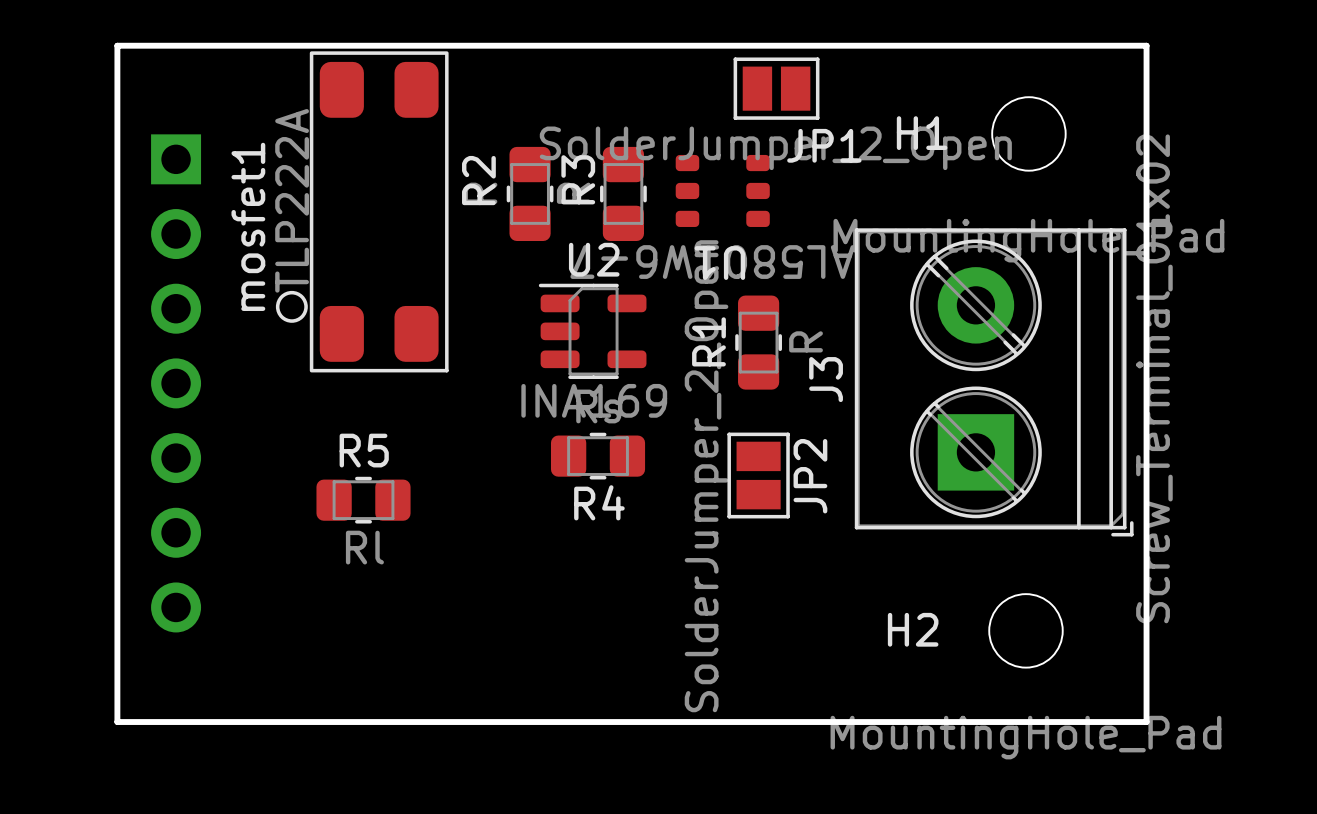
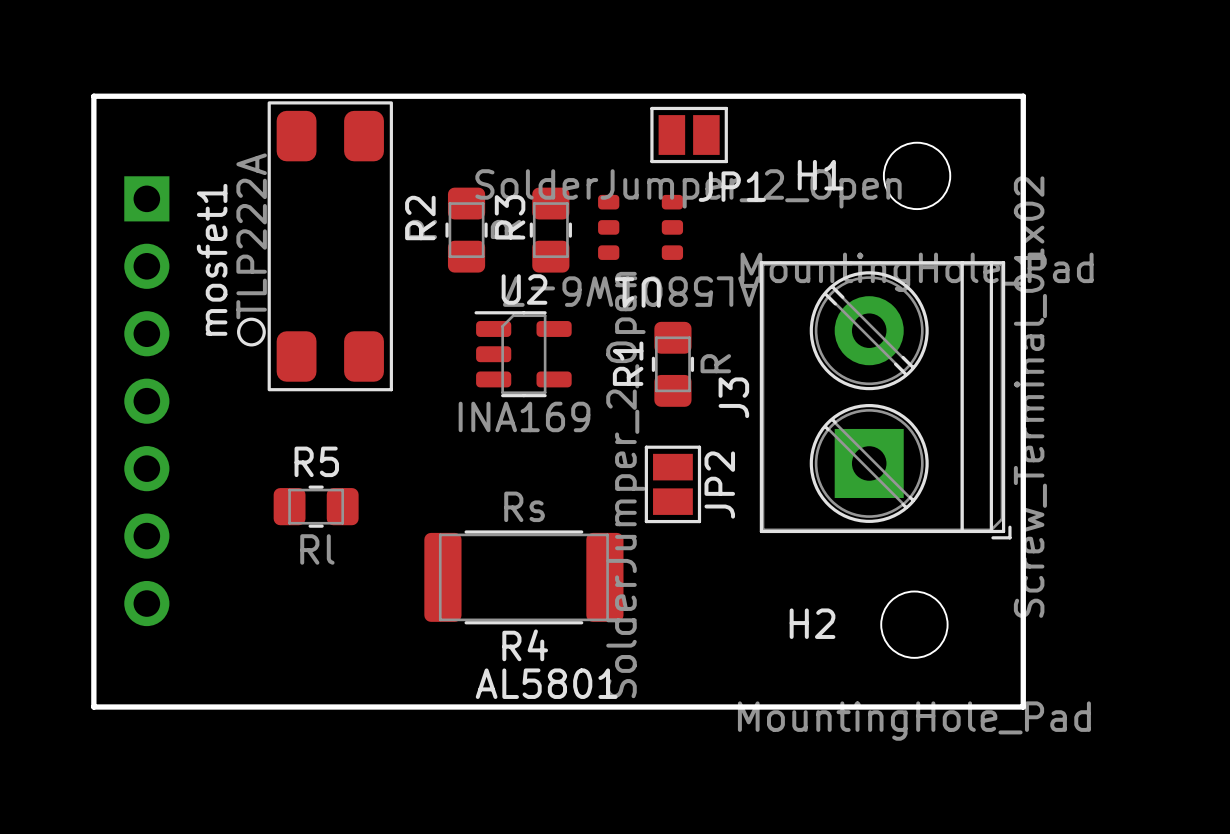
R4 footprint: [550, 432, 646, 480] -> [424, 530, 624, 625]
text: none -> AL5801 (546, 683)

